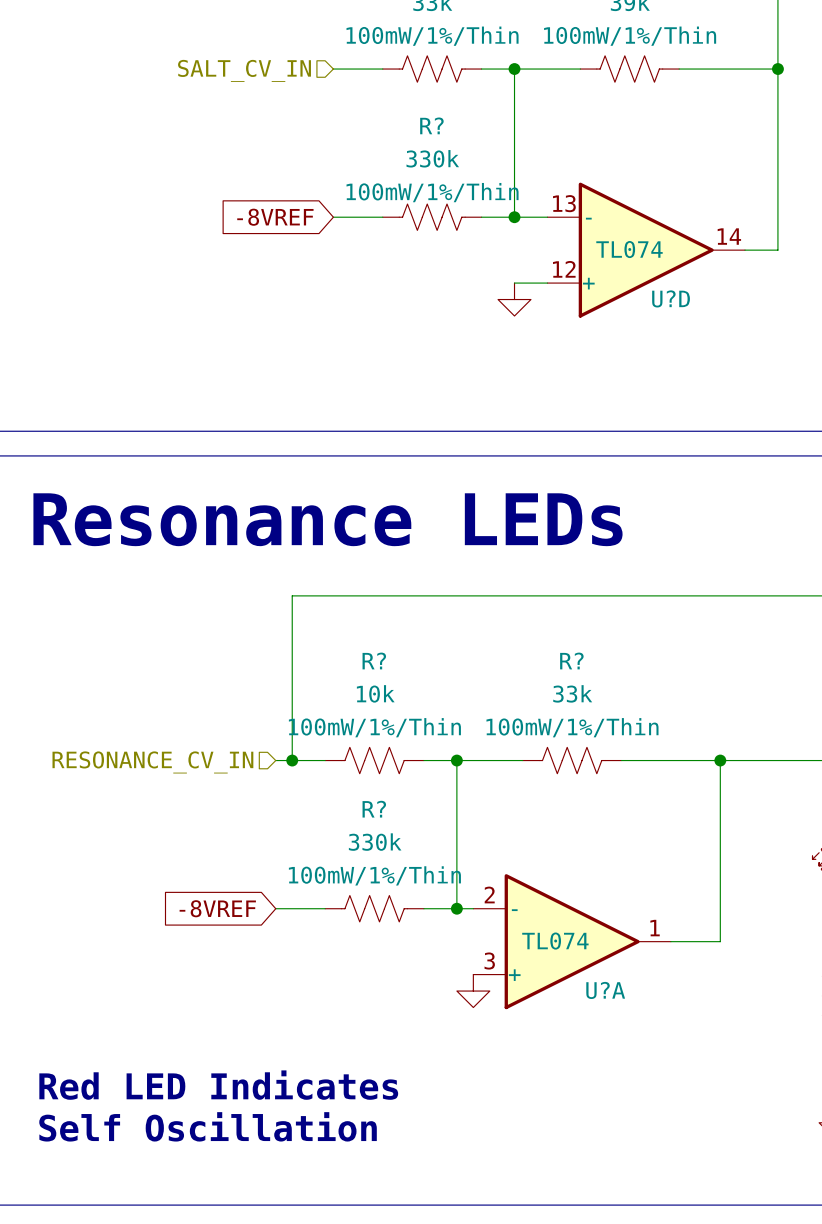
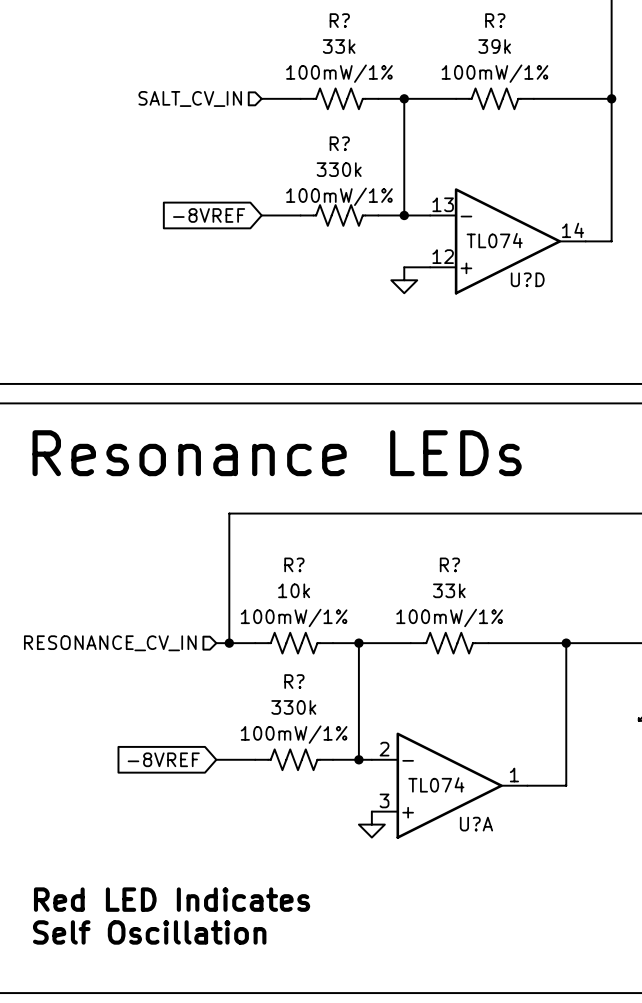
R? text: 100mW/1%/Thin (432, 36) -> 100mW/1% (339, 73)
R? text: 100mW/1%/Thin (630, 36) -> 100mW/1% (494, 73)
R? text: 100mW/1%/Thin (432, 192) -> 100mW/1% (339, 196)
R? text: 100mW/1%/Thin (374, 727) -> 100mW/1% (294, 617)
R? text: 100mW/1%/Thin (572, 727) -> 100mW/1% (449, 617)
R? text: 100mW/1%/Thin (374, 875) -> 100mW/1% (294, 734)

